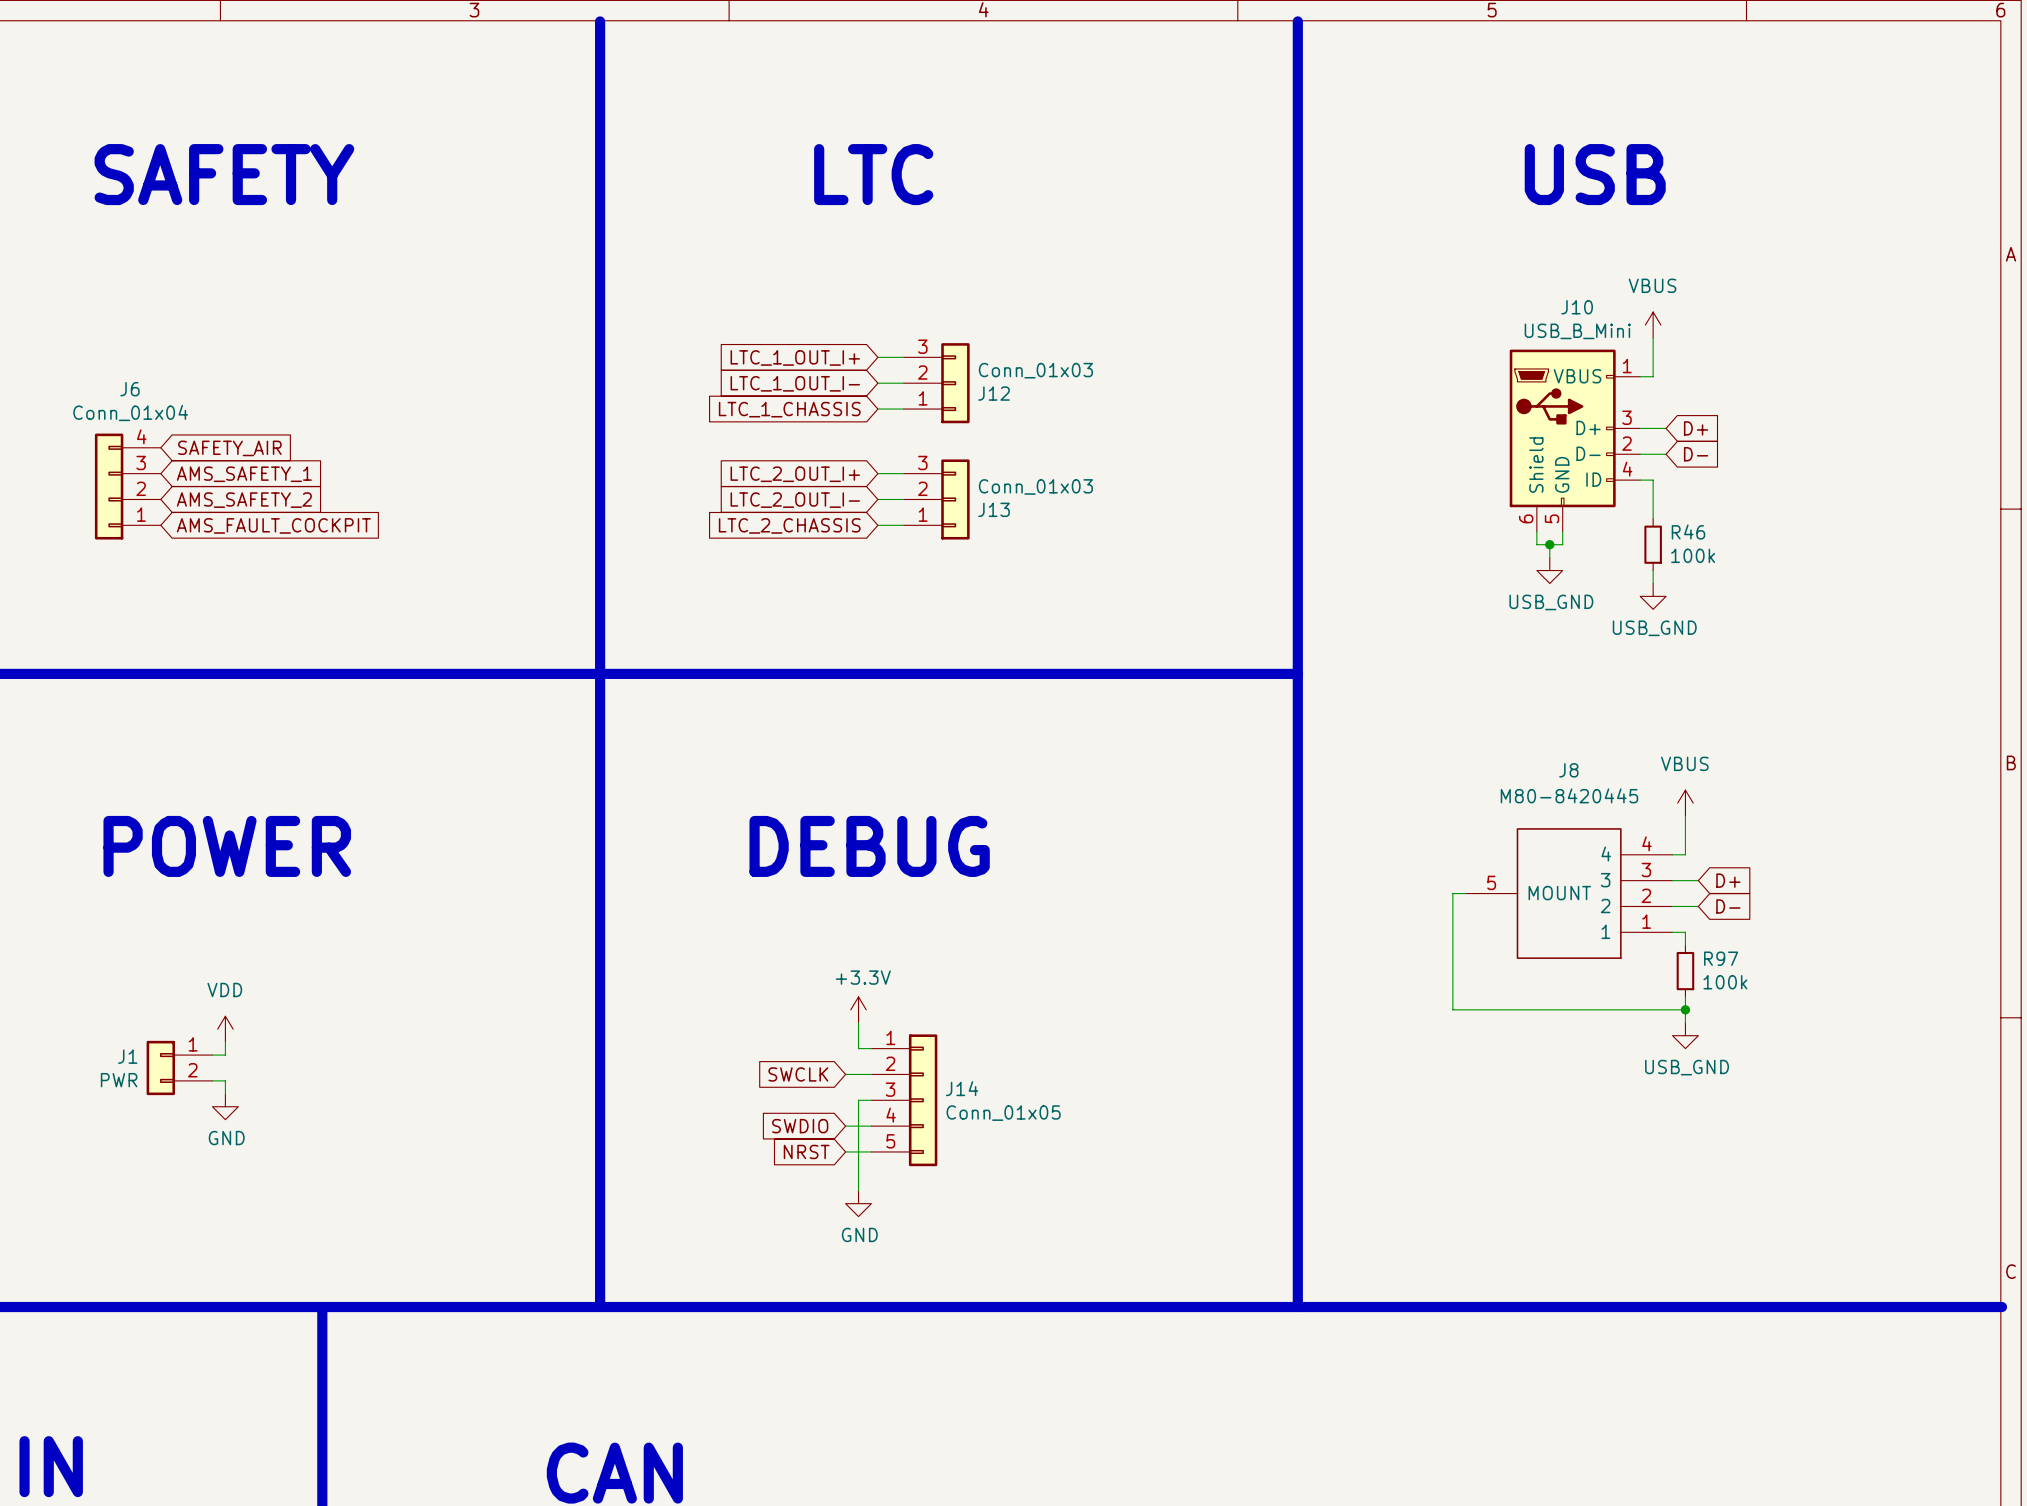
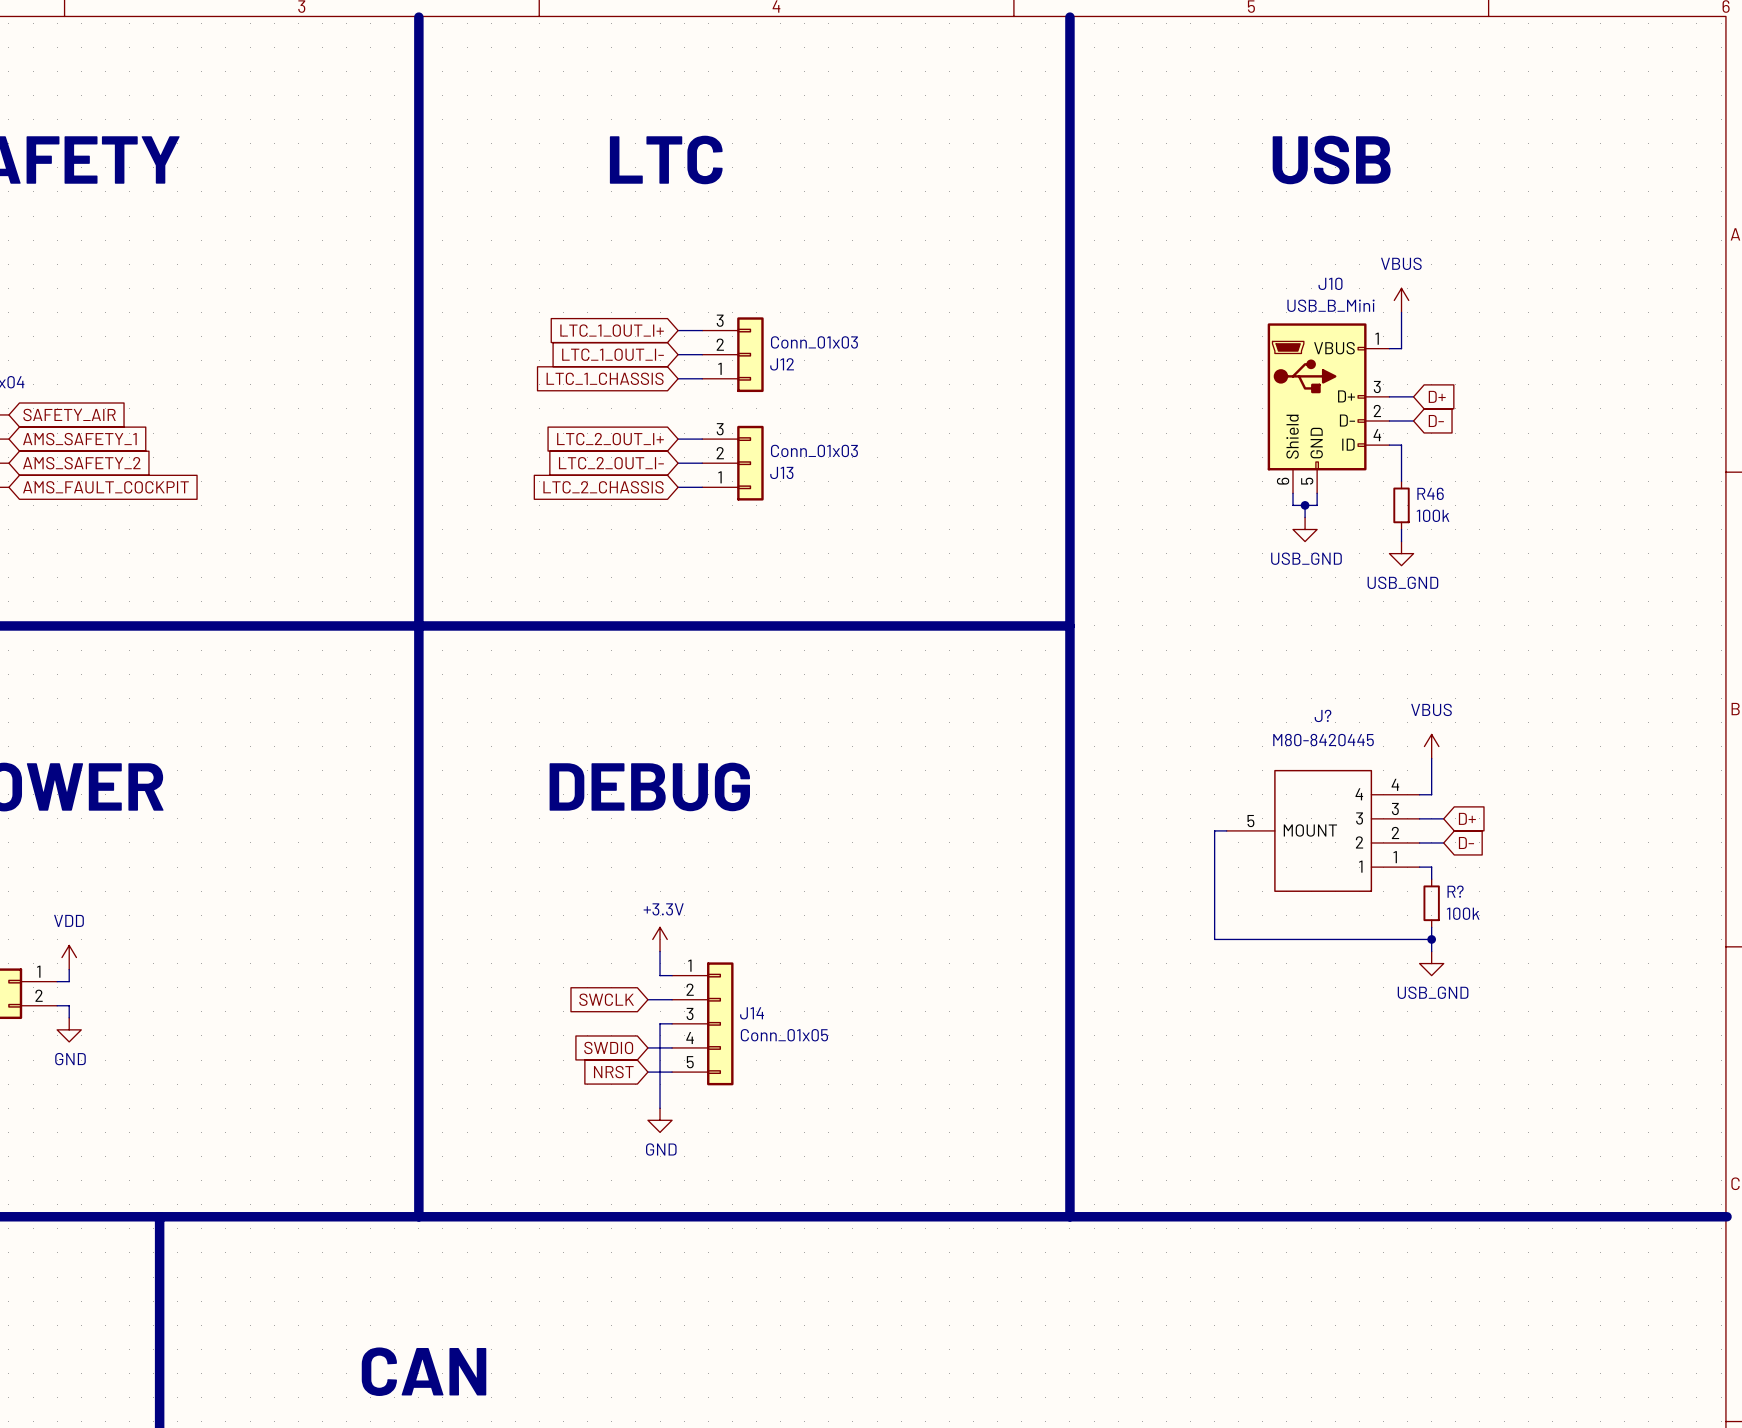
J8 name: J8 (1568, 770) -> J? (1323, 715)
R97 name: R97 (1721, 958) -> R? (1455, 891)

